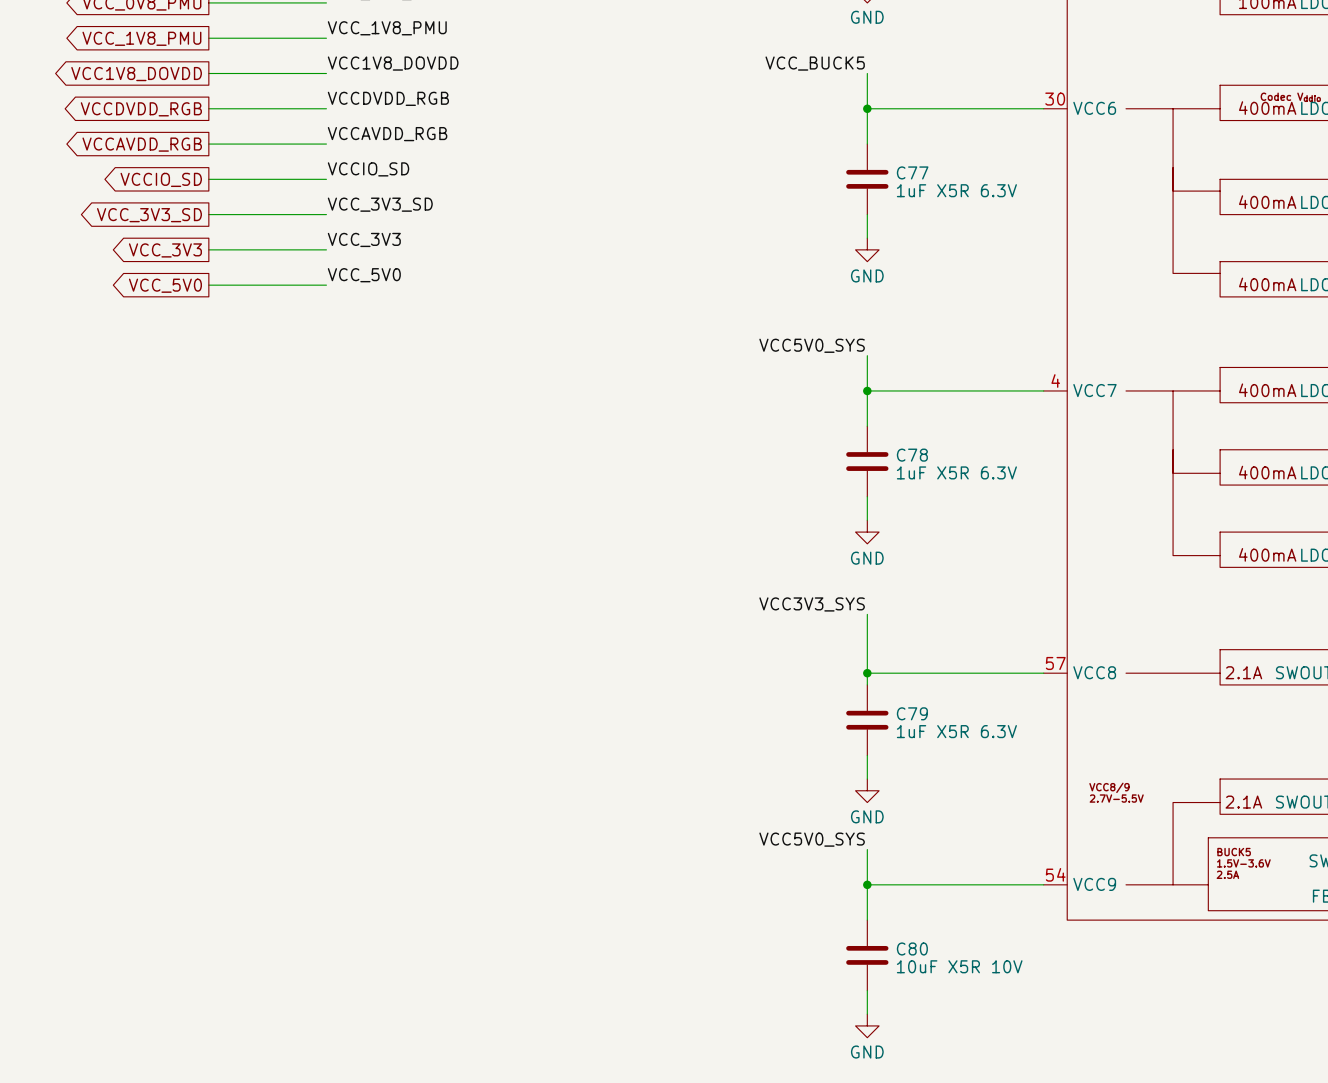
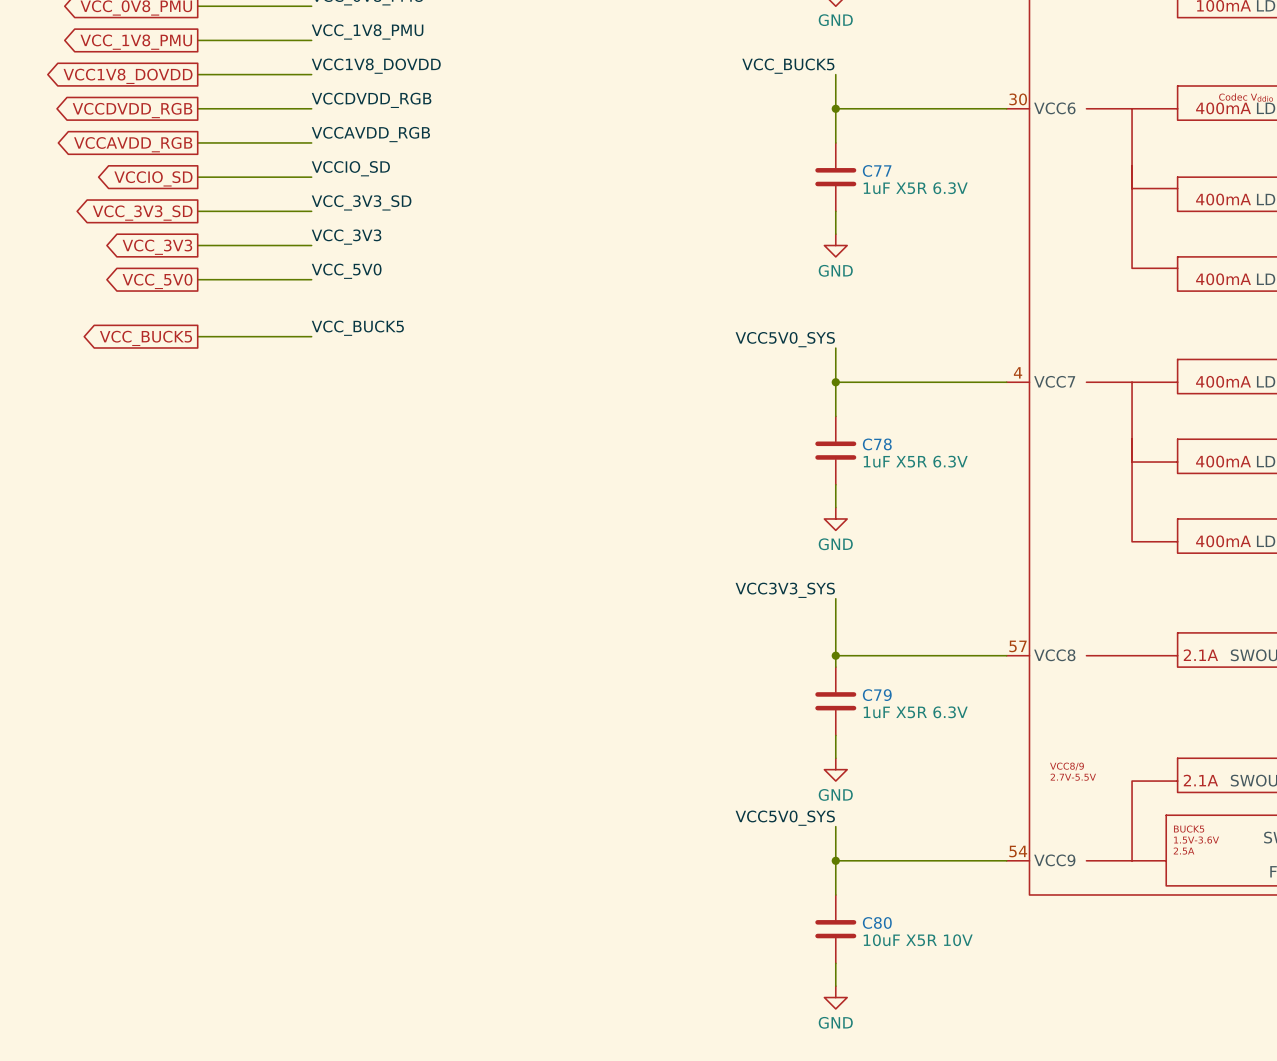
label: none -> VCC_BUCK5 (357, 328)
wire: none -> (197, 336) (311, 336)
global label: none -> VCC_BUCK5 (146, 338)

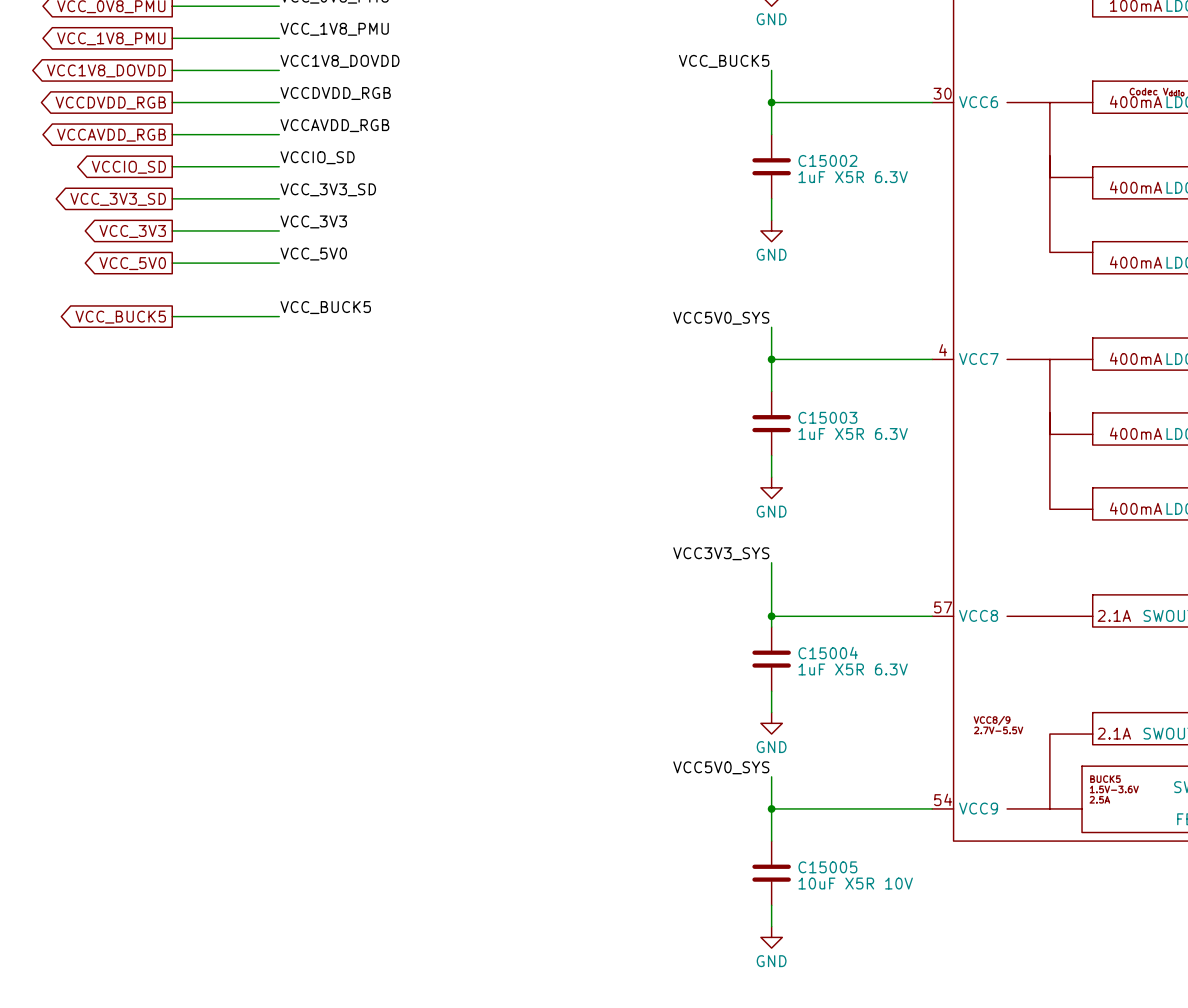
C77 name: C77 (877, 170) -> C15002 (827, 160)
C78 name: C78 (877, 444) -> C15003 (827, 417)
C79 name: C79 (877, 695) -> C15004 (828, 653)
C80 name: C80 (877, 922) -> C15005 (827, 867)

